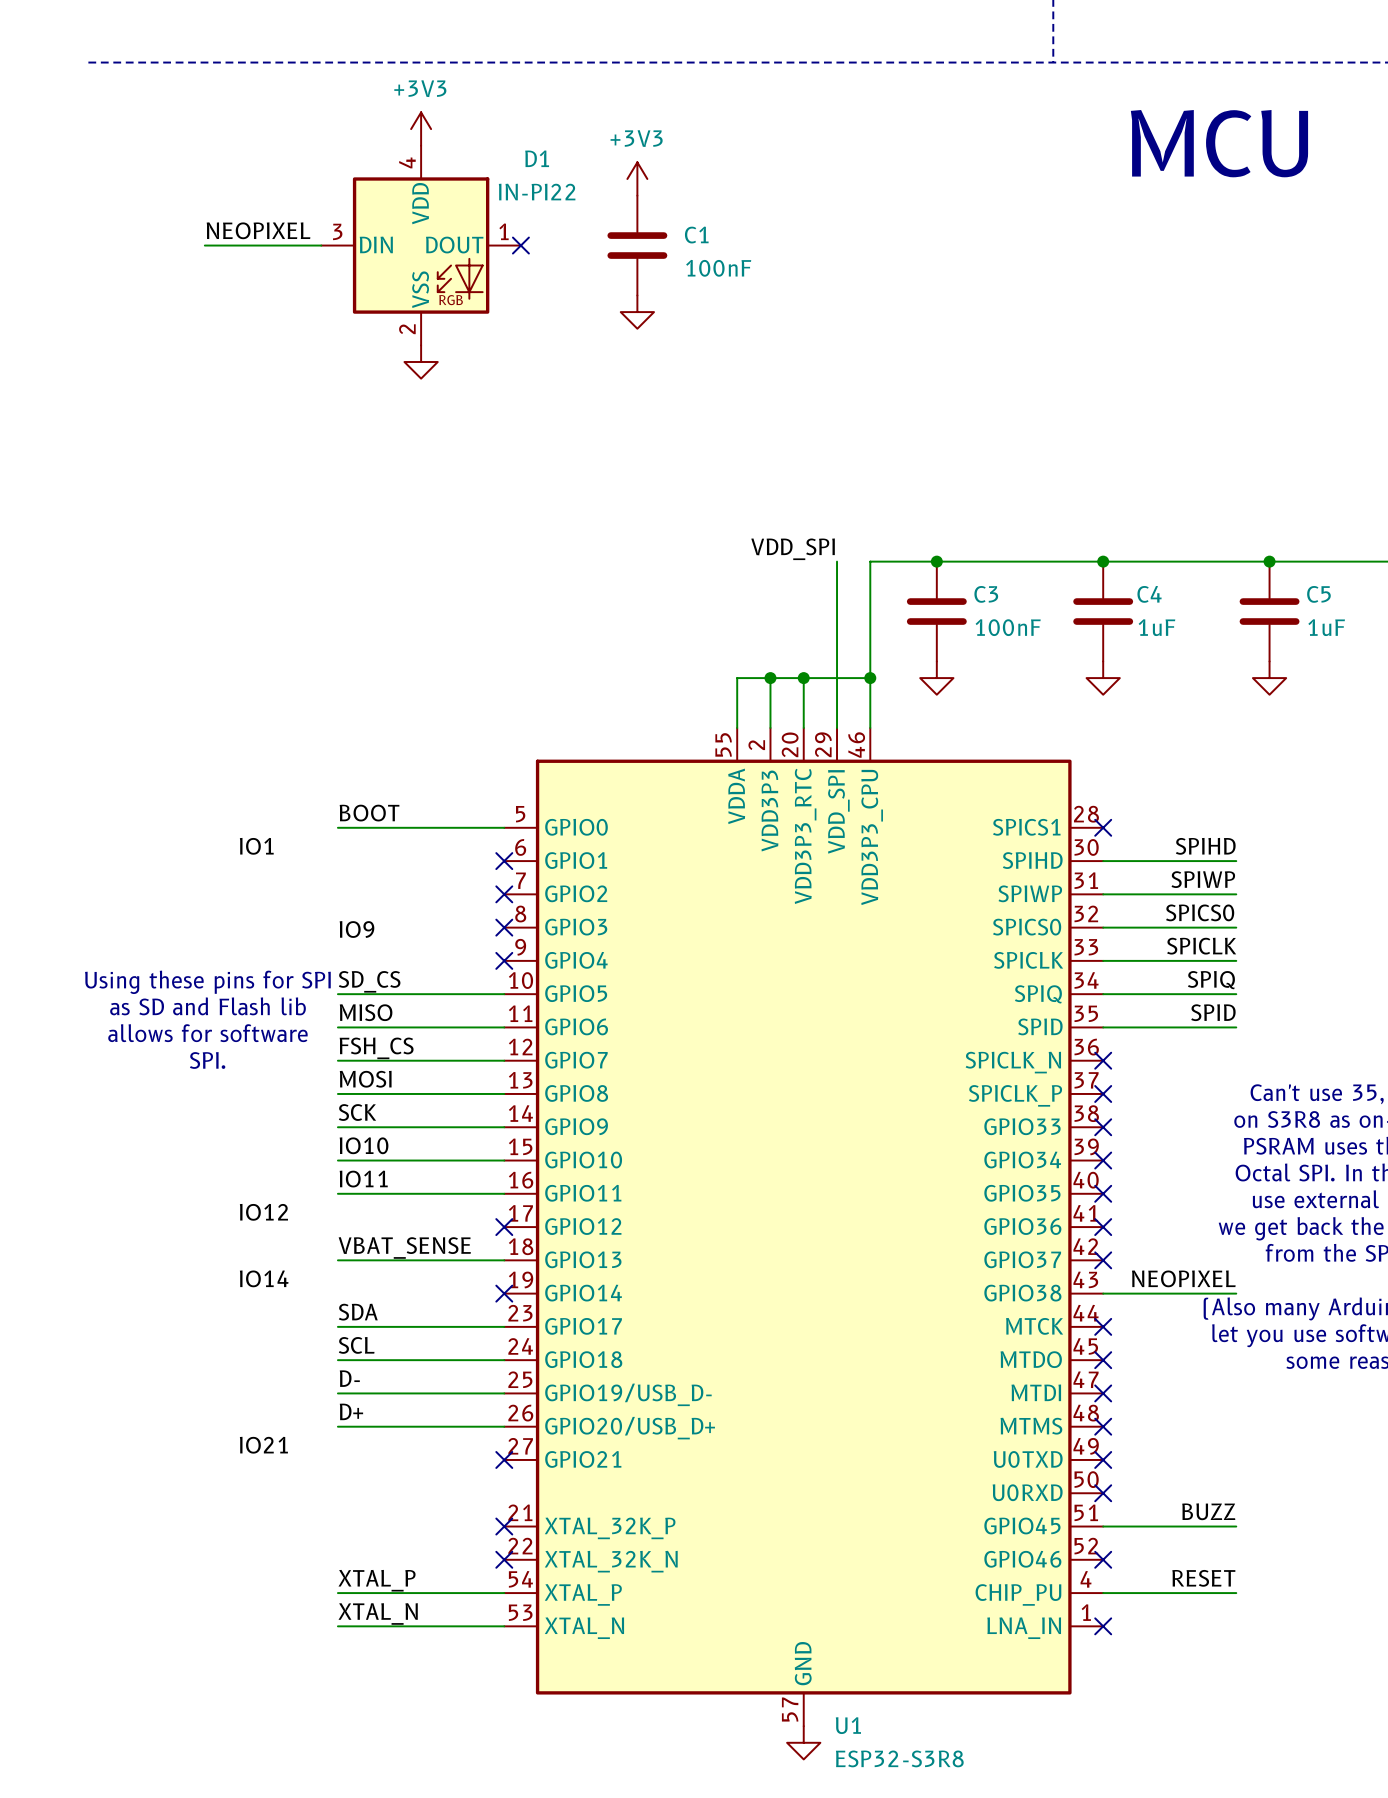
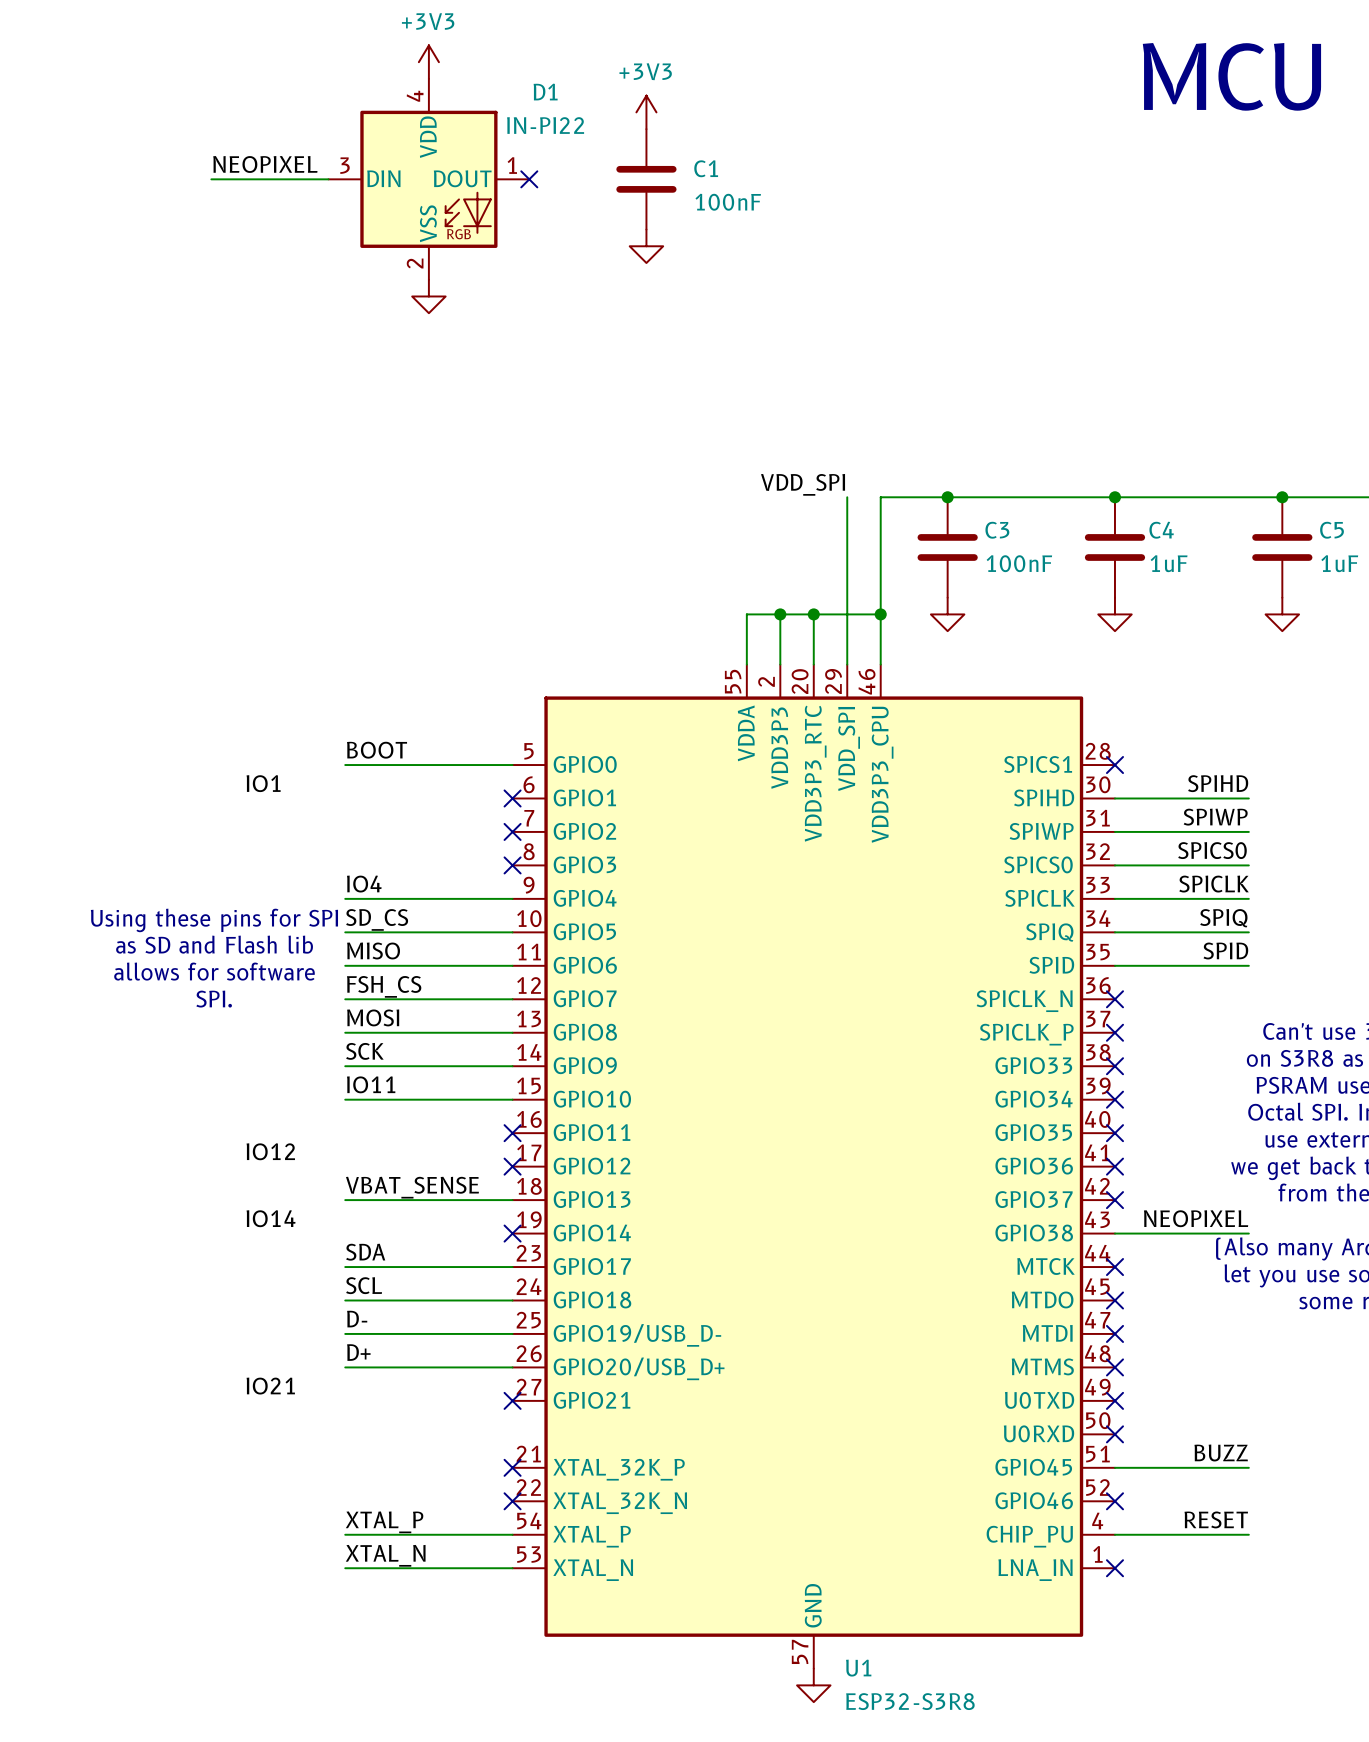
label: IO9 (356, 929) -> IO4 (364, 884)
no-connect mark: (504, 960) -> none
label: IO10 (364, 1145) -> IO11 (371, 1084)
label: IO11 (363, 1179) -> none
wire: (337, 1193) (504, 1193) -> (345, 898) (512, 898)
no-connect mark: none -> (512, 1133)

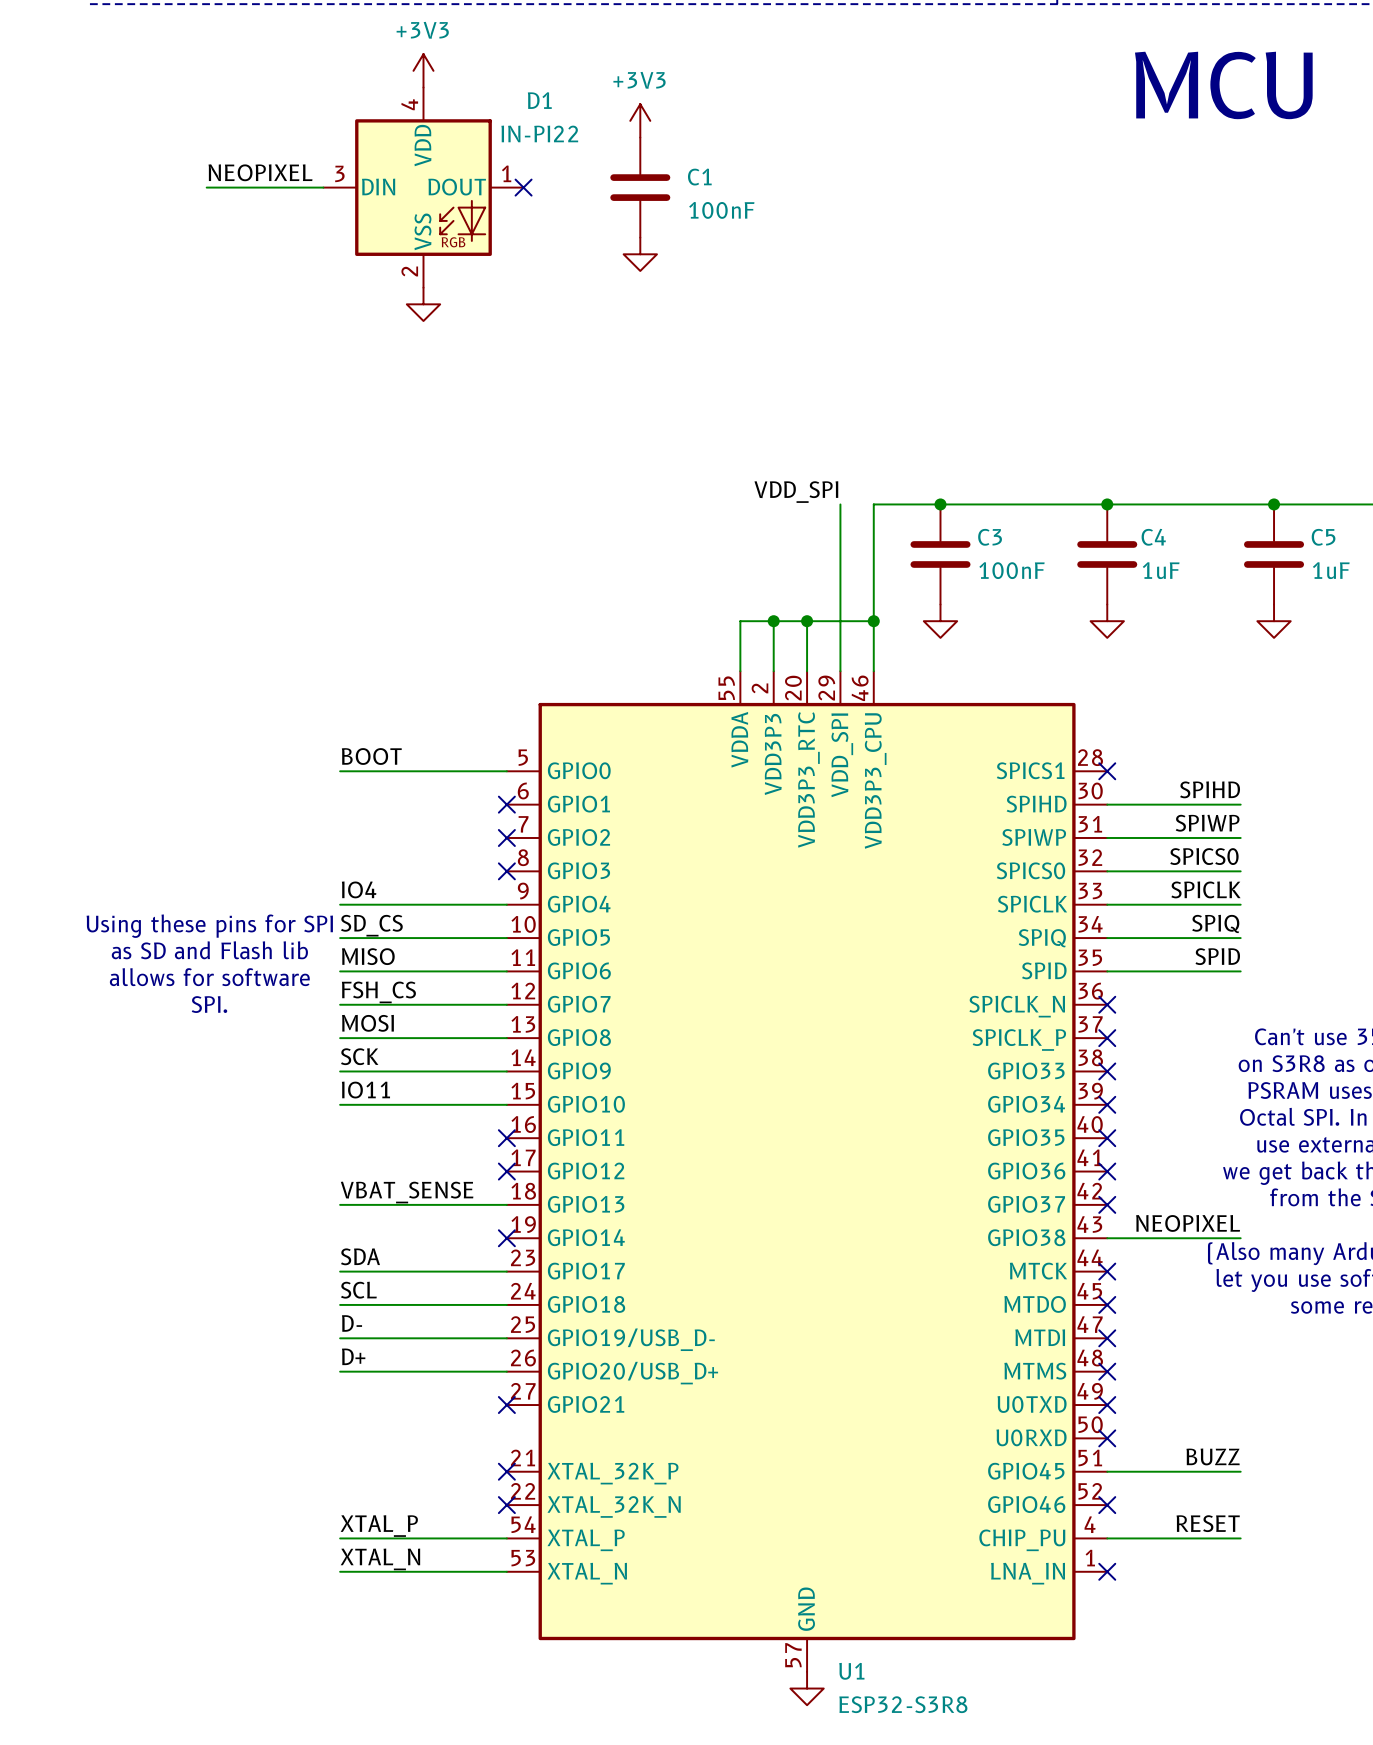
label: IO1 (263, 783) -> none
label: IO12 (270, 1151) -> none
label: IO14 (271, 1218) -> none
label: IO21 (270, 1386) -> none

